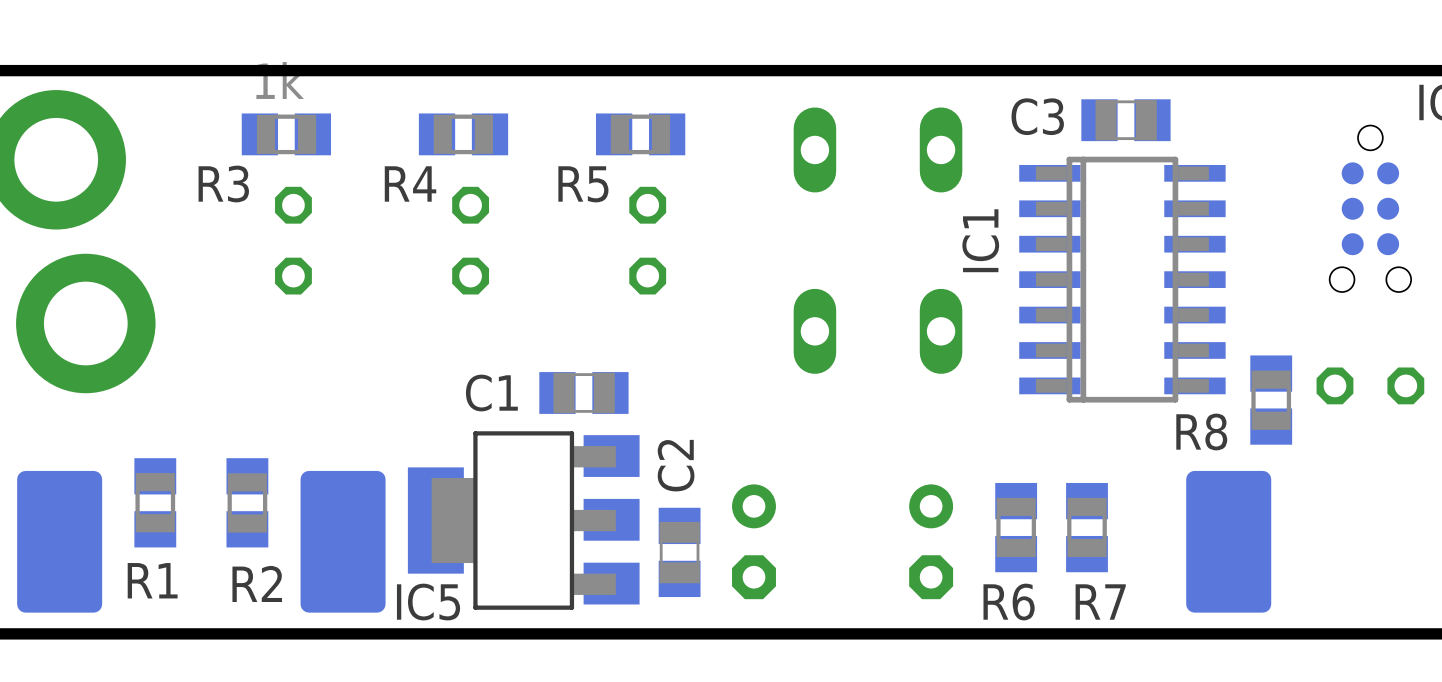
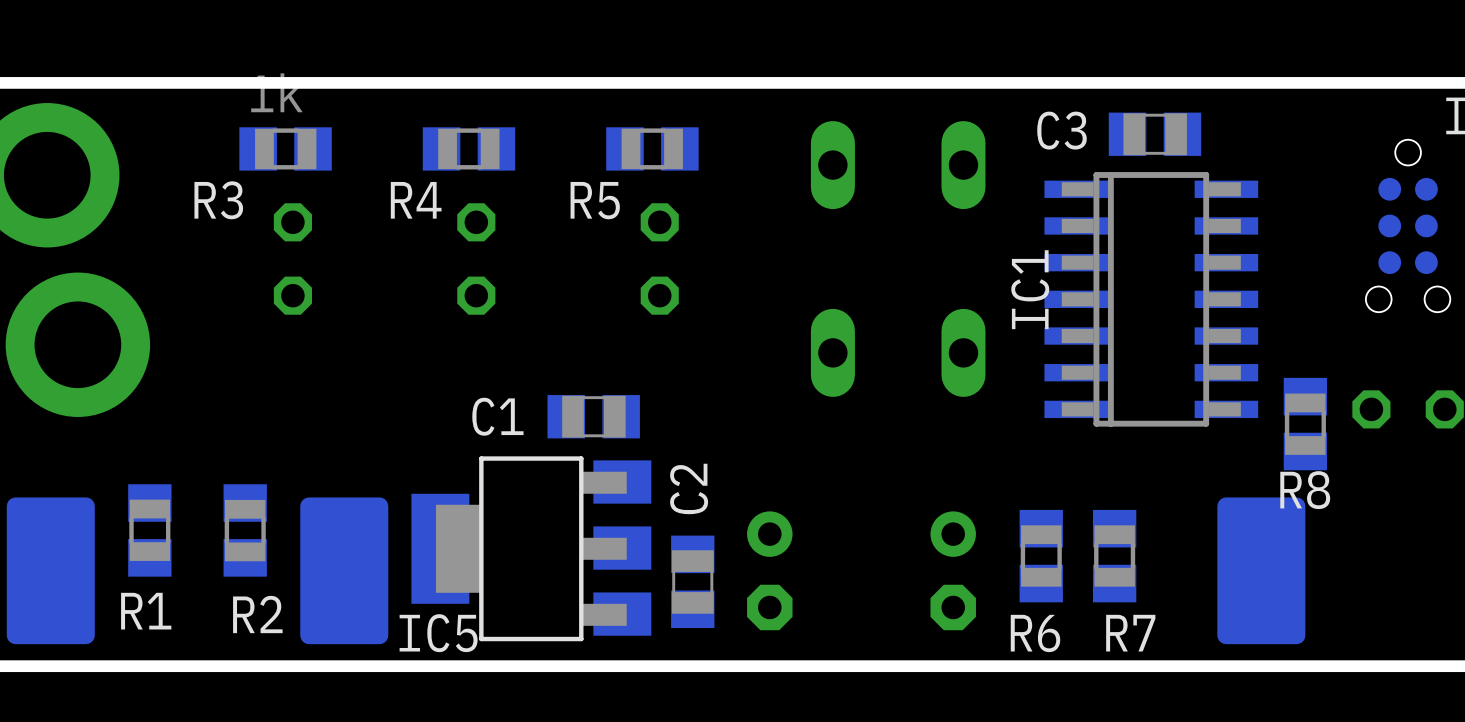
IC1 name position: IC1 (980, 240) -> IC1 (1030, 289)
R8 name position: R8 (1201, 431) -> R8 (1305, 490)

